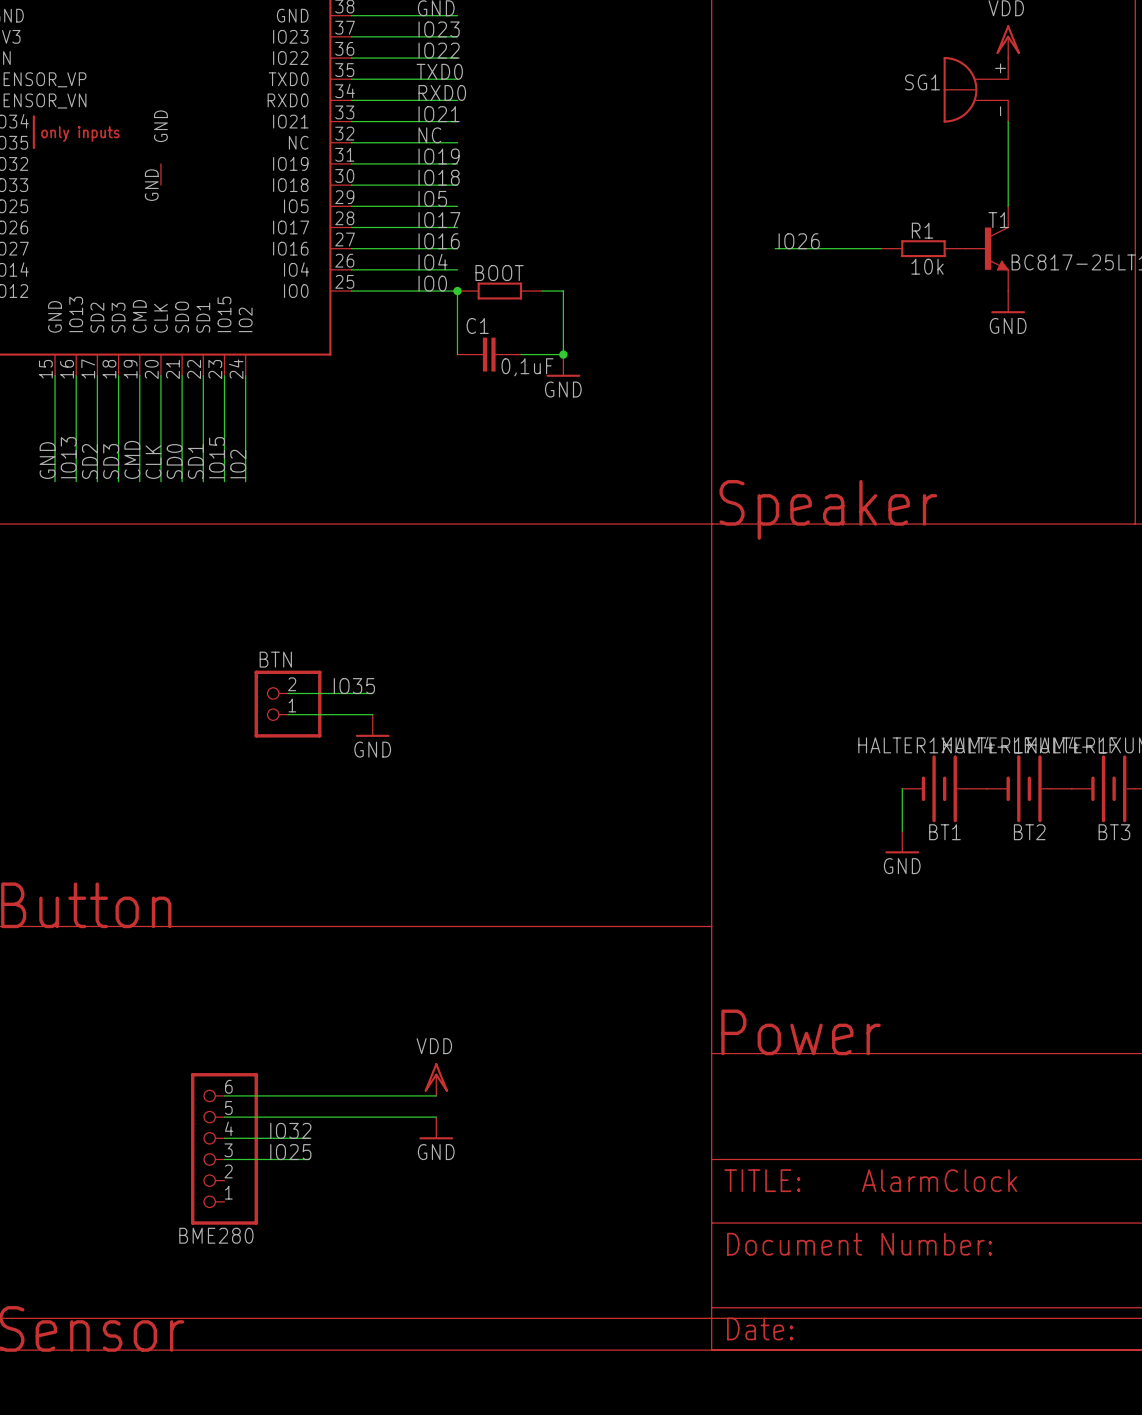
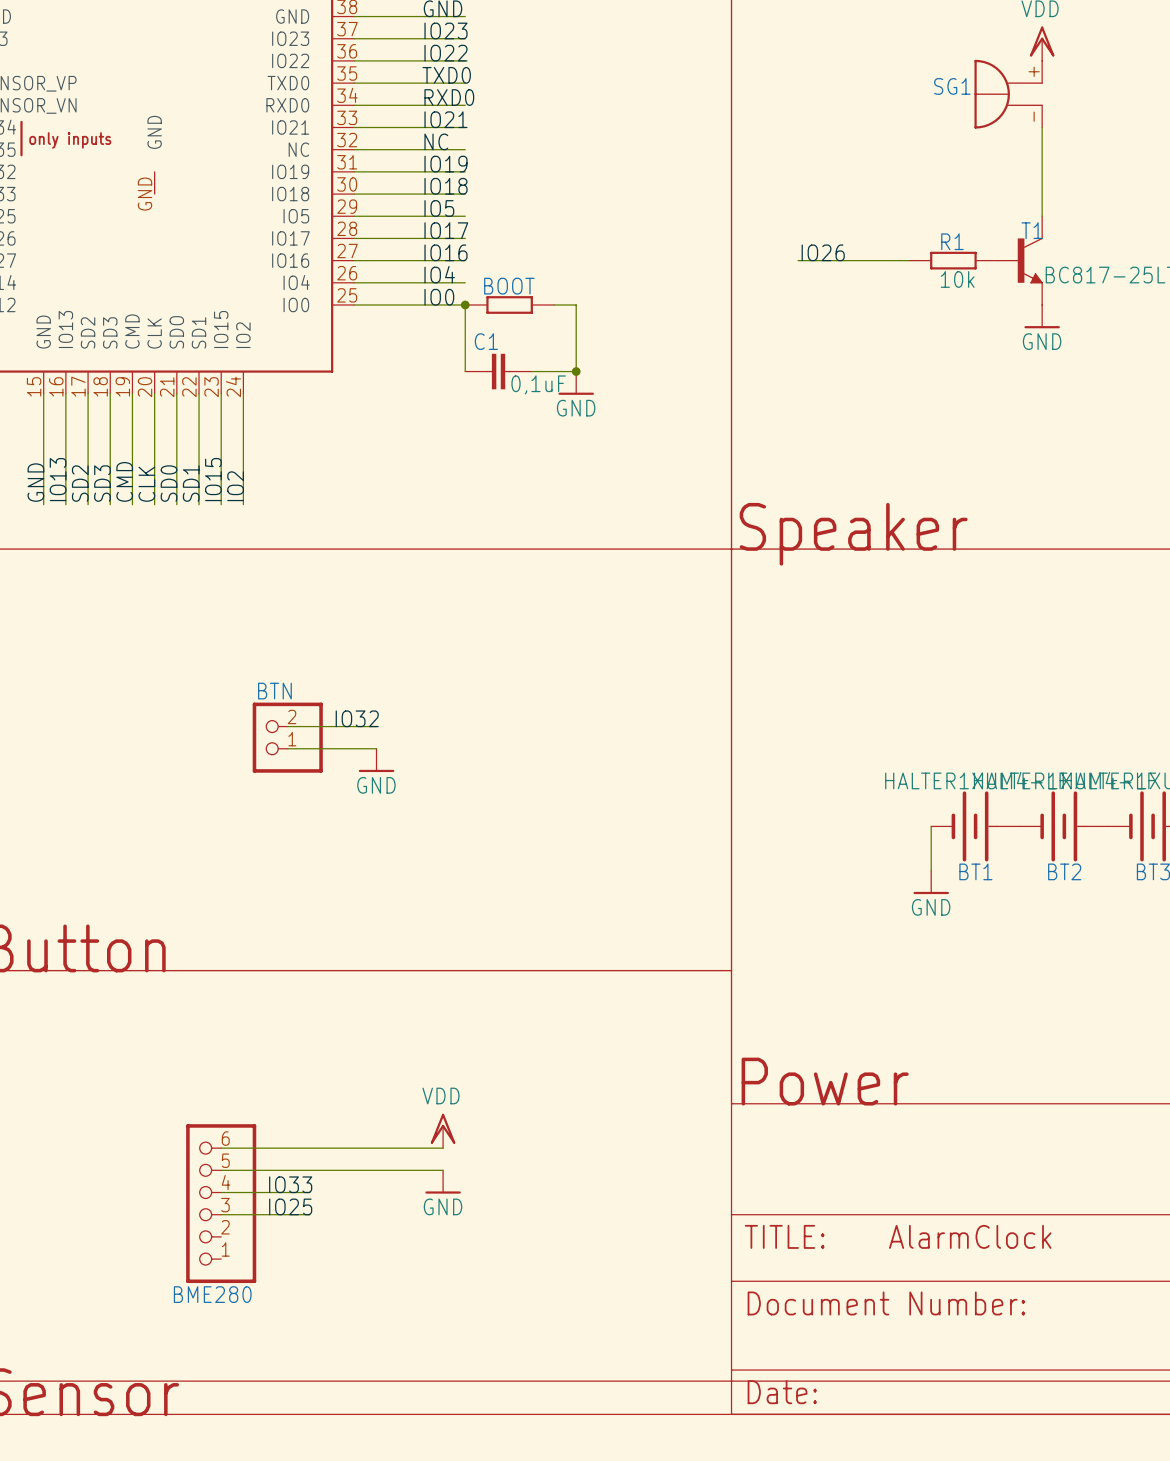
label: IO35 (354, 686) -> IO32 (357, 718)
label: IO32 (290, 1130) -> IO33 (290, 1184)

